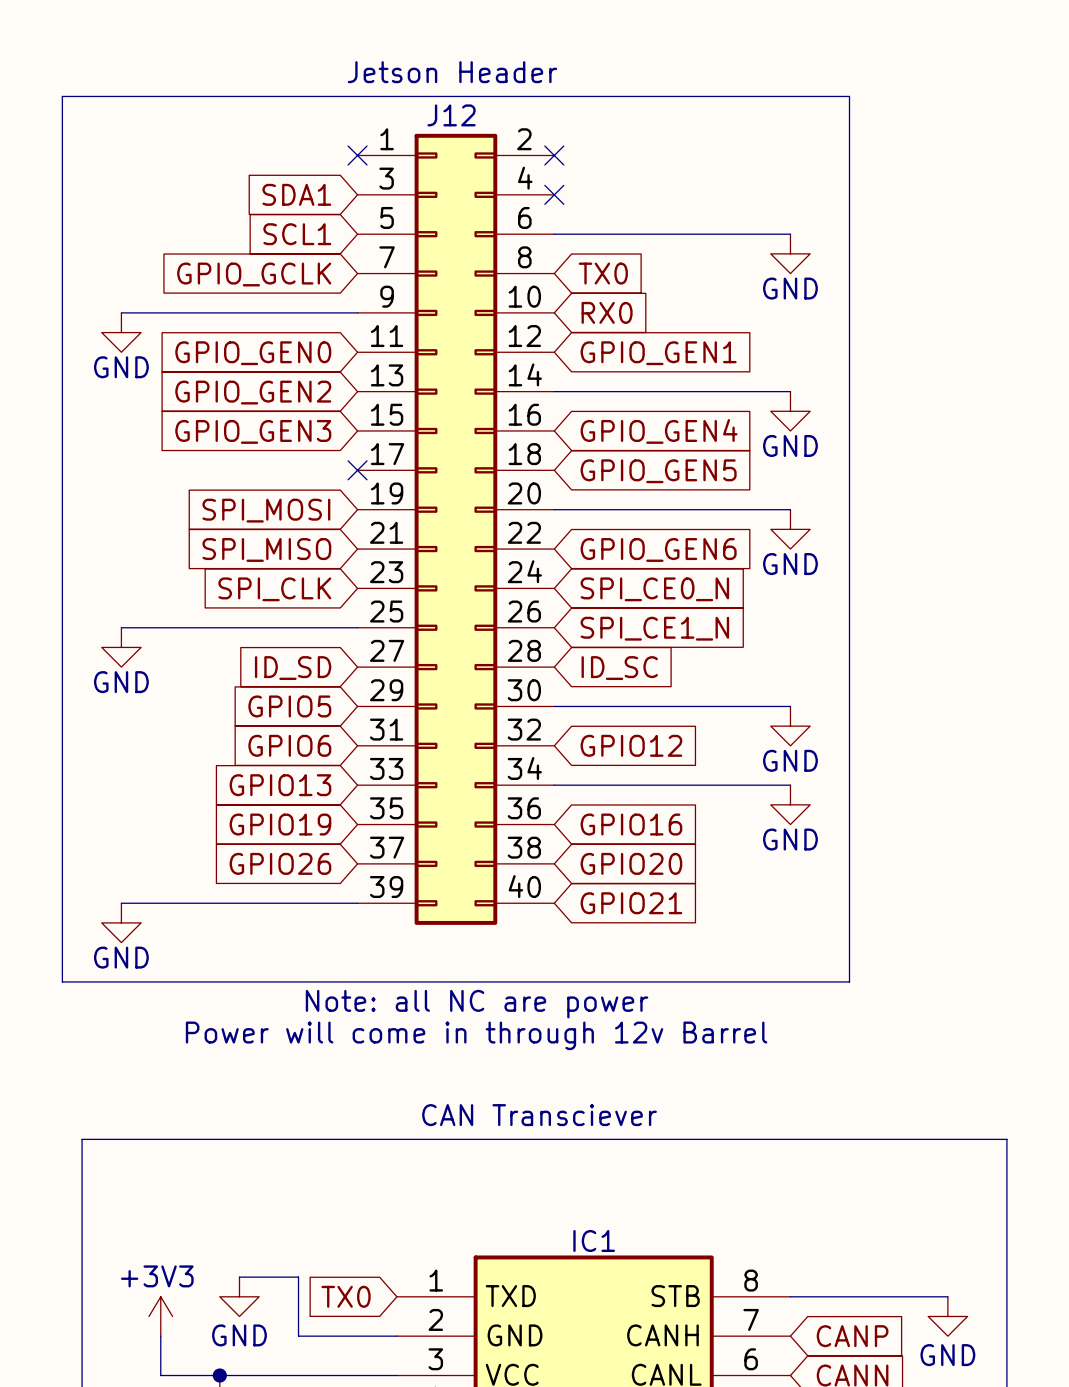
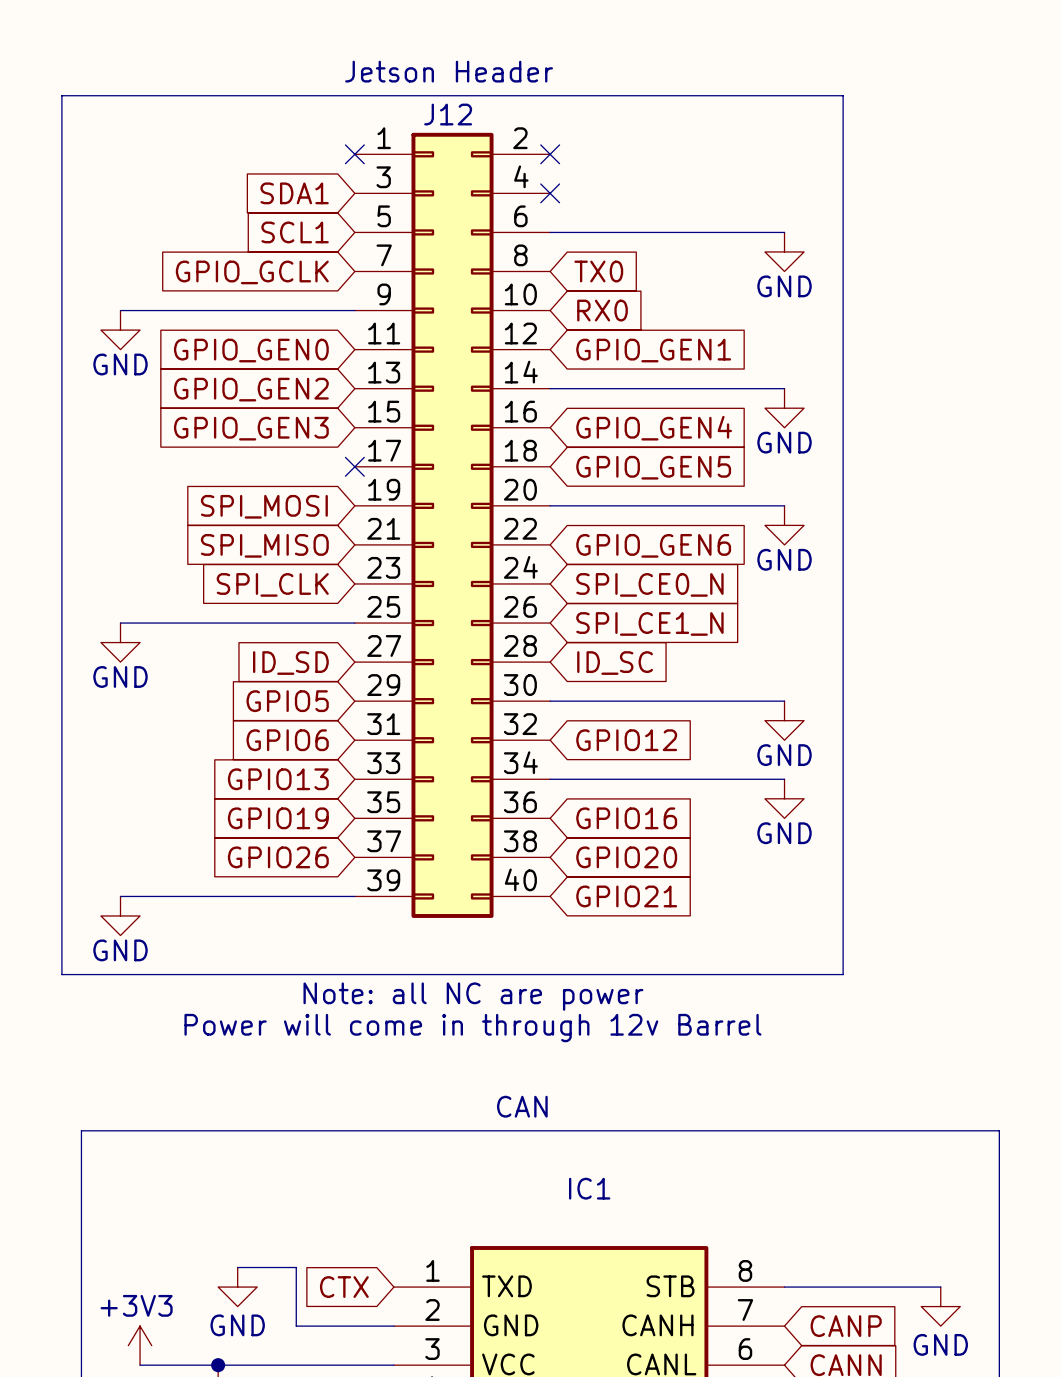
text: CAN Transciever (539, 1115) -> CAN (522, 1106)
IC1 name position: IC1 (594, 1240) -> IC1 (589, 1188)
global label: TX0 (346, 1296) -> CTX (344, 1287)
power symbol position: +3V3 (160, 1316) -> +3V3 (140, 1345)
wire: (160, 1336) (160, 1375) -> (140, 1365) (159, 1365)

